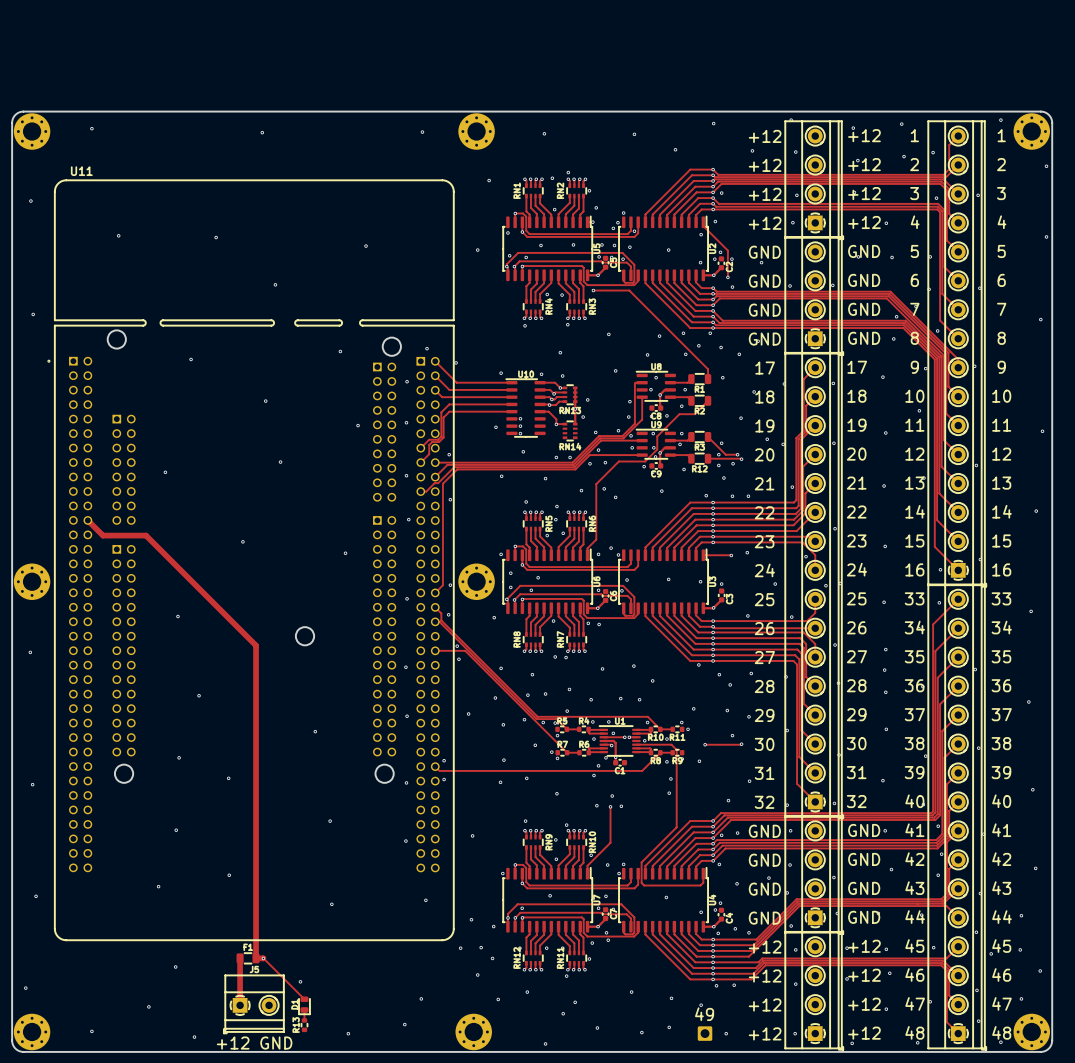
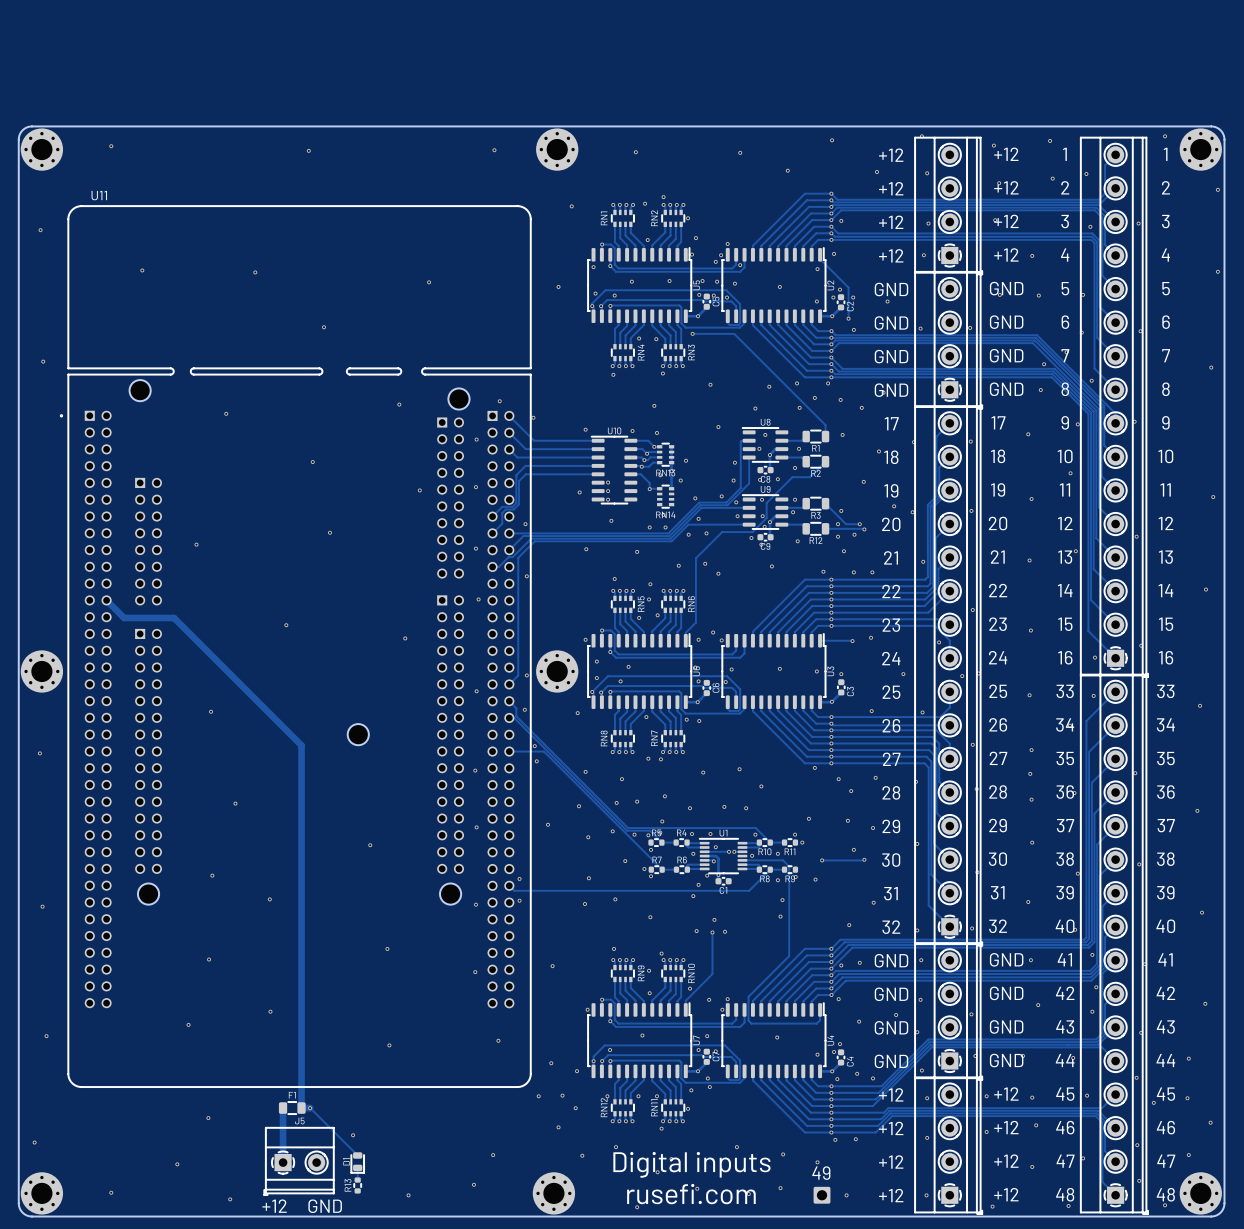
text: none -> Digital inputs (691, 1164)
text: none -> rusefi.com (691, 1194)

